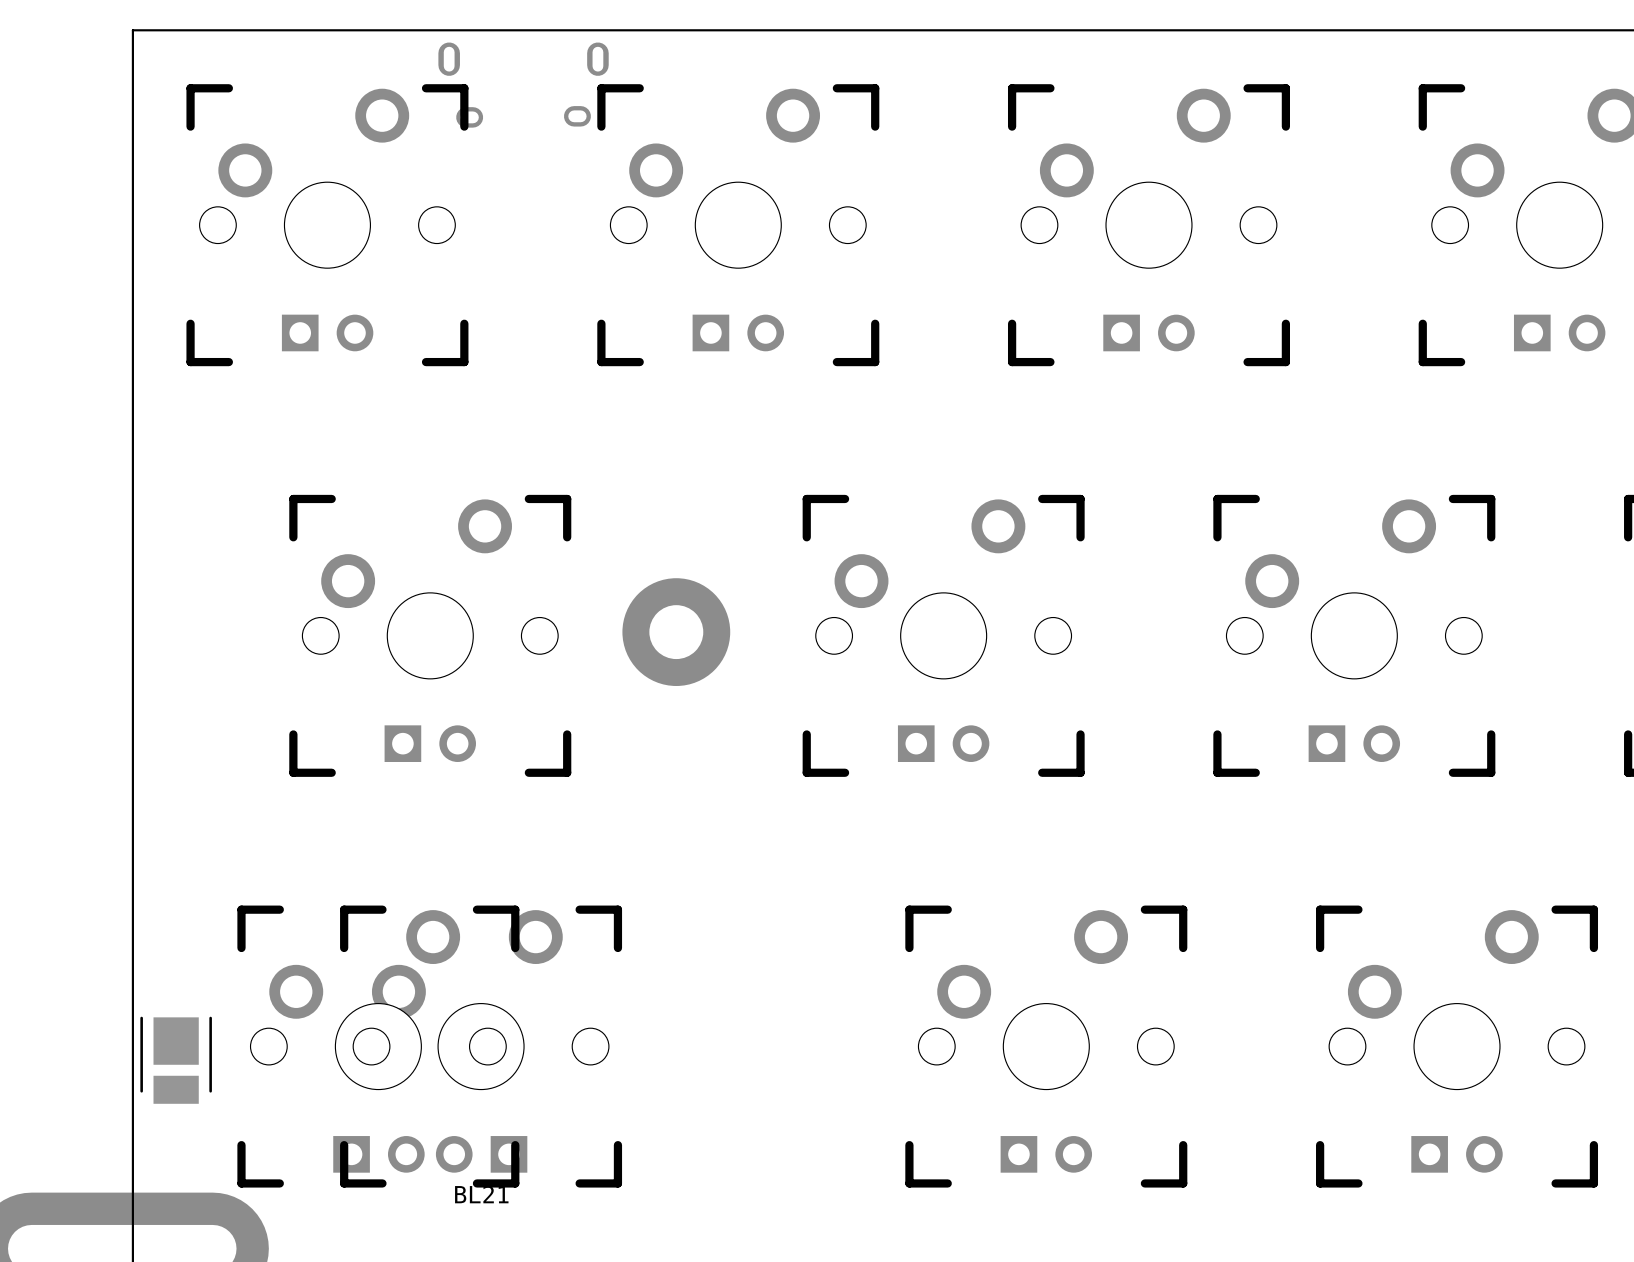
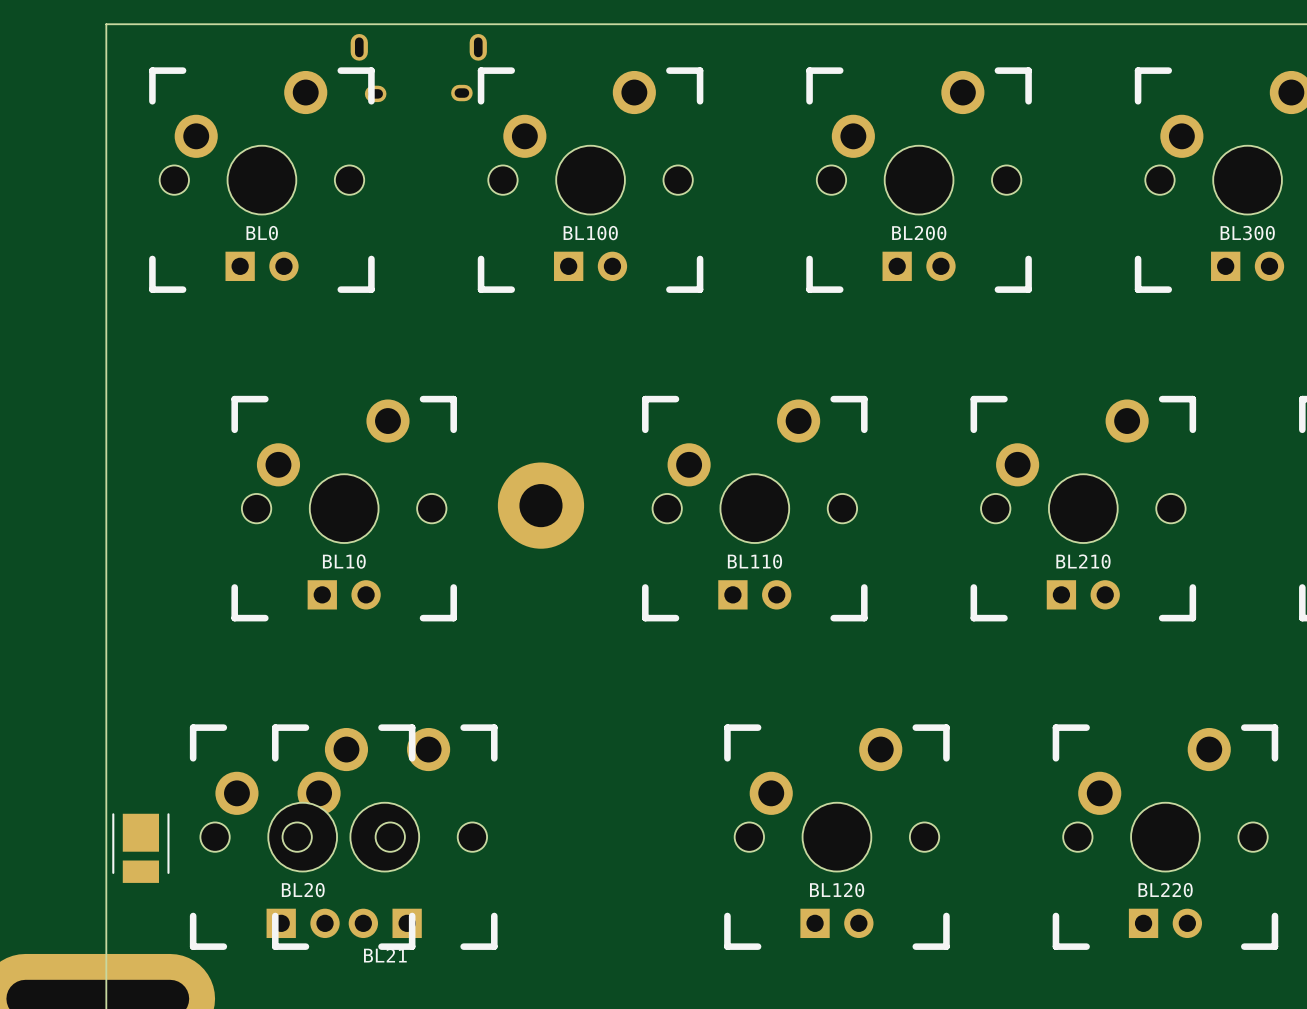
BL0 name: none -> BL0 (262, 233)
BL100 name: none -> BL100 (590, 233)
BL200 name: none -> BL200 (919, 233)
BL300 name: none -> BL300 (1247, 233)
BL10 name: none -> BL10 (344, 561)
BL110 name: none -> BL110 (754, 561)
BL210 name: none -> BL210 (1083, 561)
BL20 name: none -> BL20 (303, 890)
BL120 name: none -> BL120 (837, 890)
BL220 name: none -> BL220 (1165, 890)

